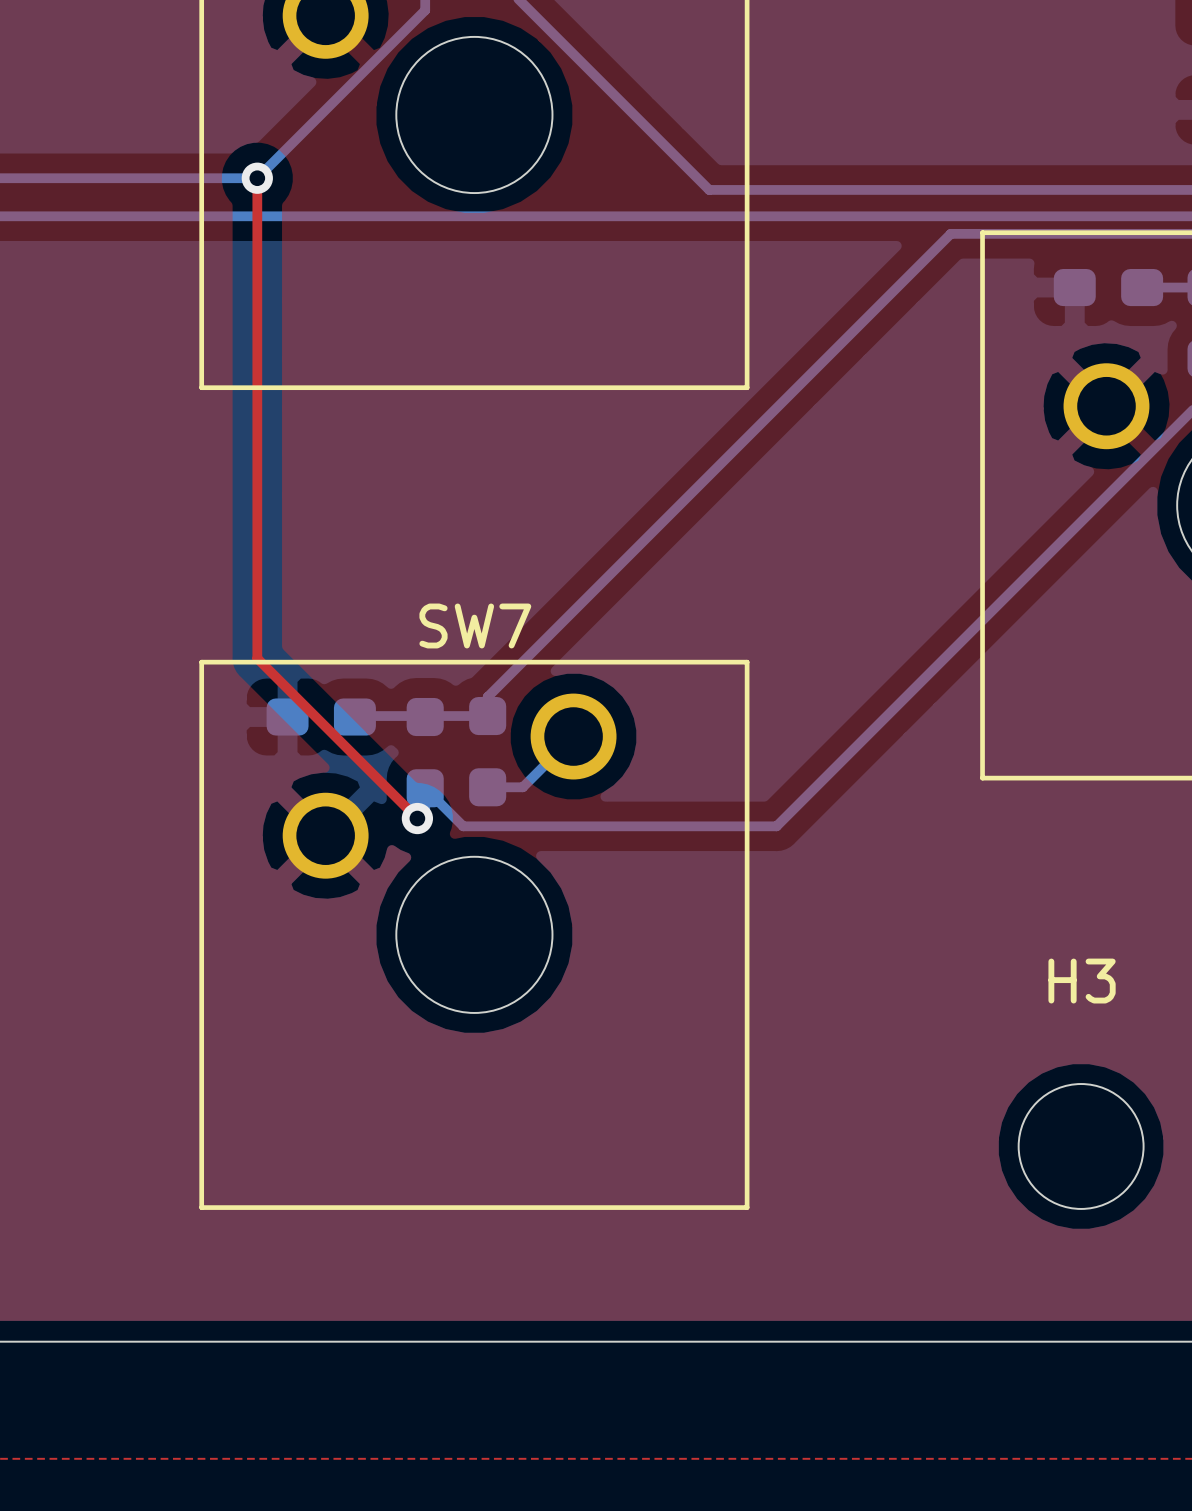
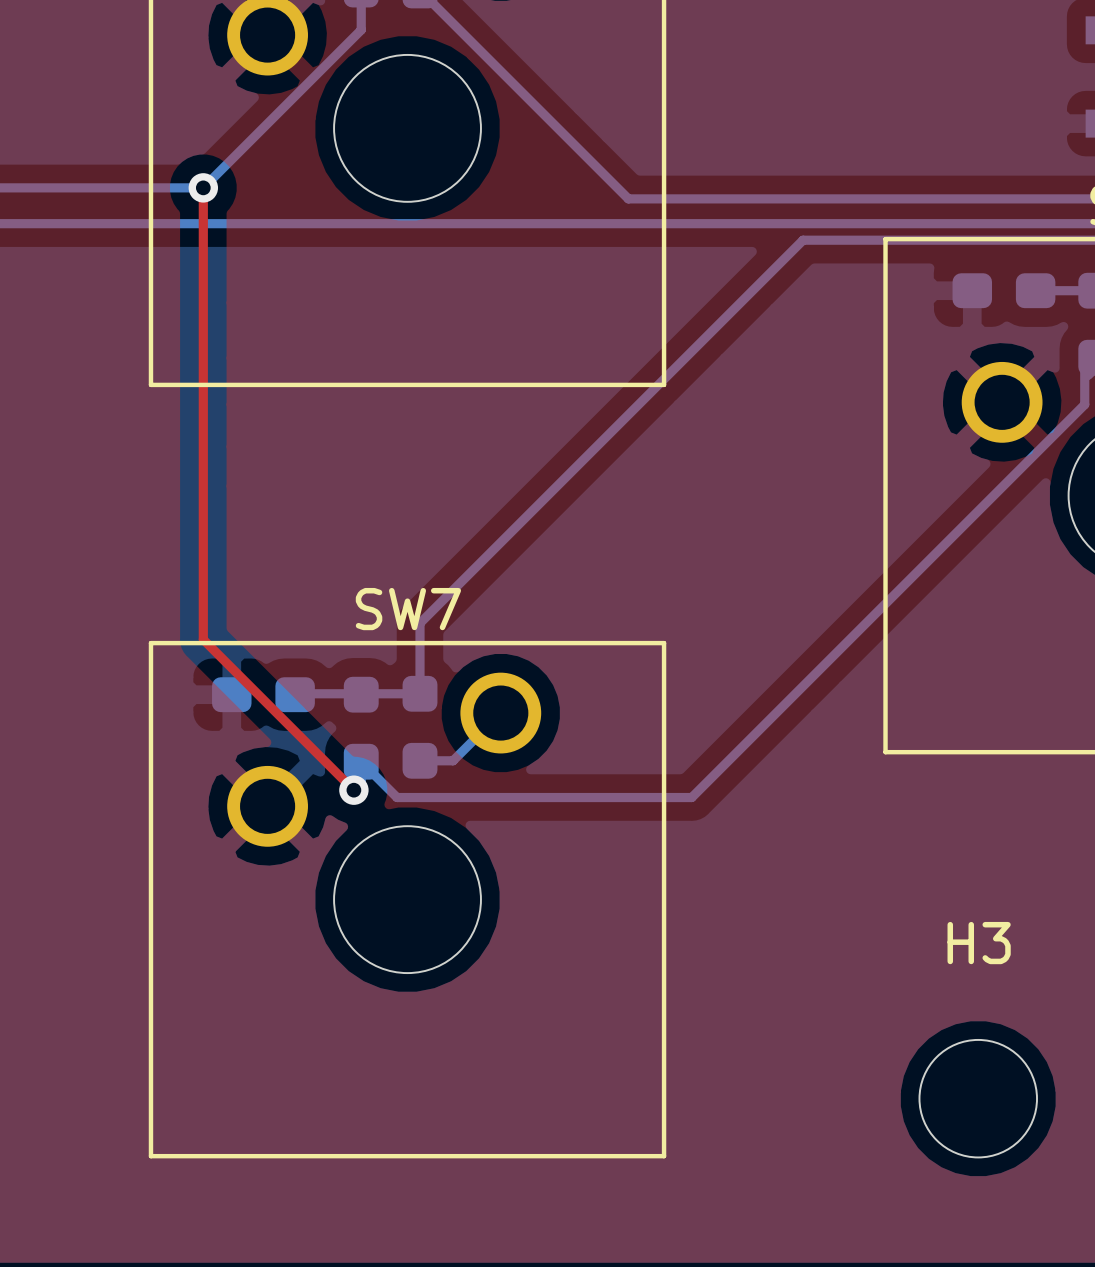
bottom track: (950, 233) (487, 697) -> (855, 240) (803, 240) (420, 623) (420, 675)

